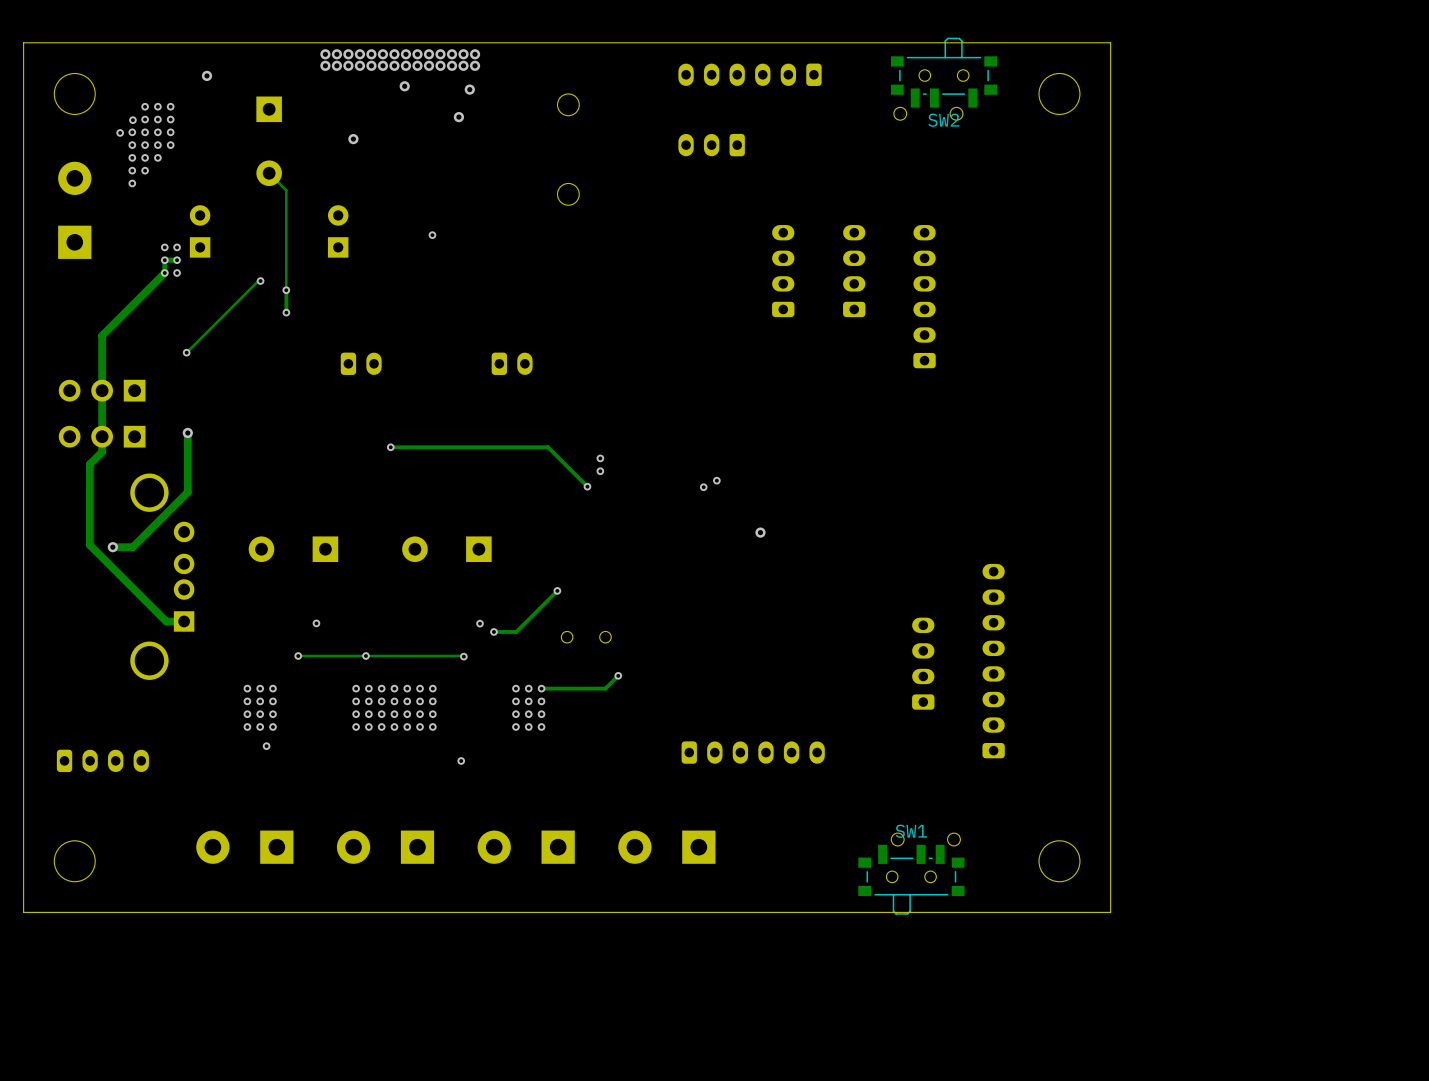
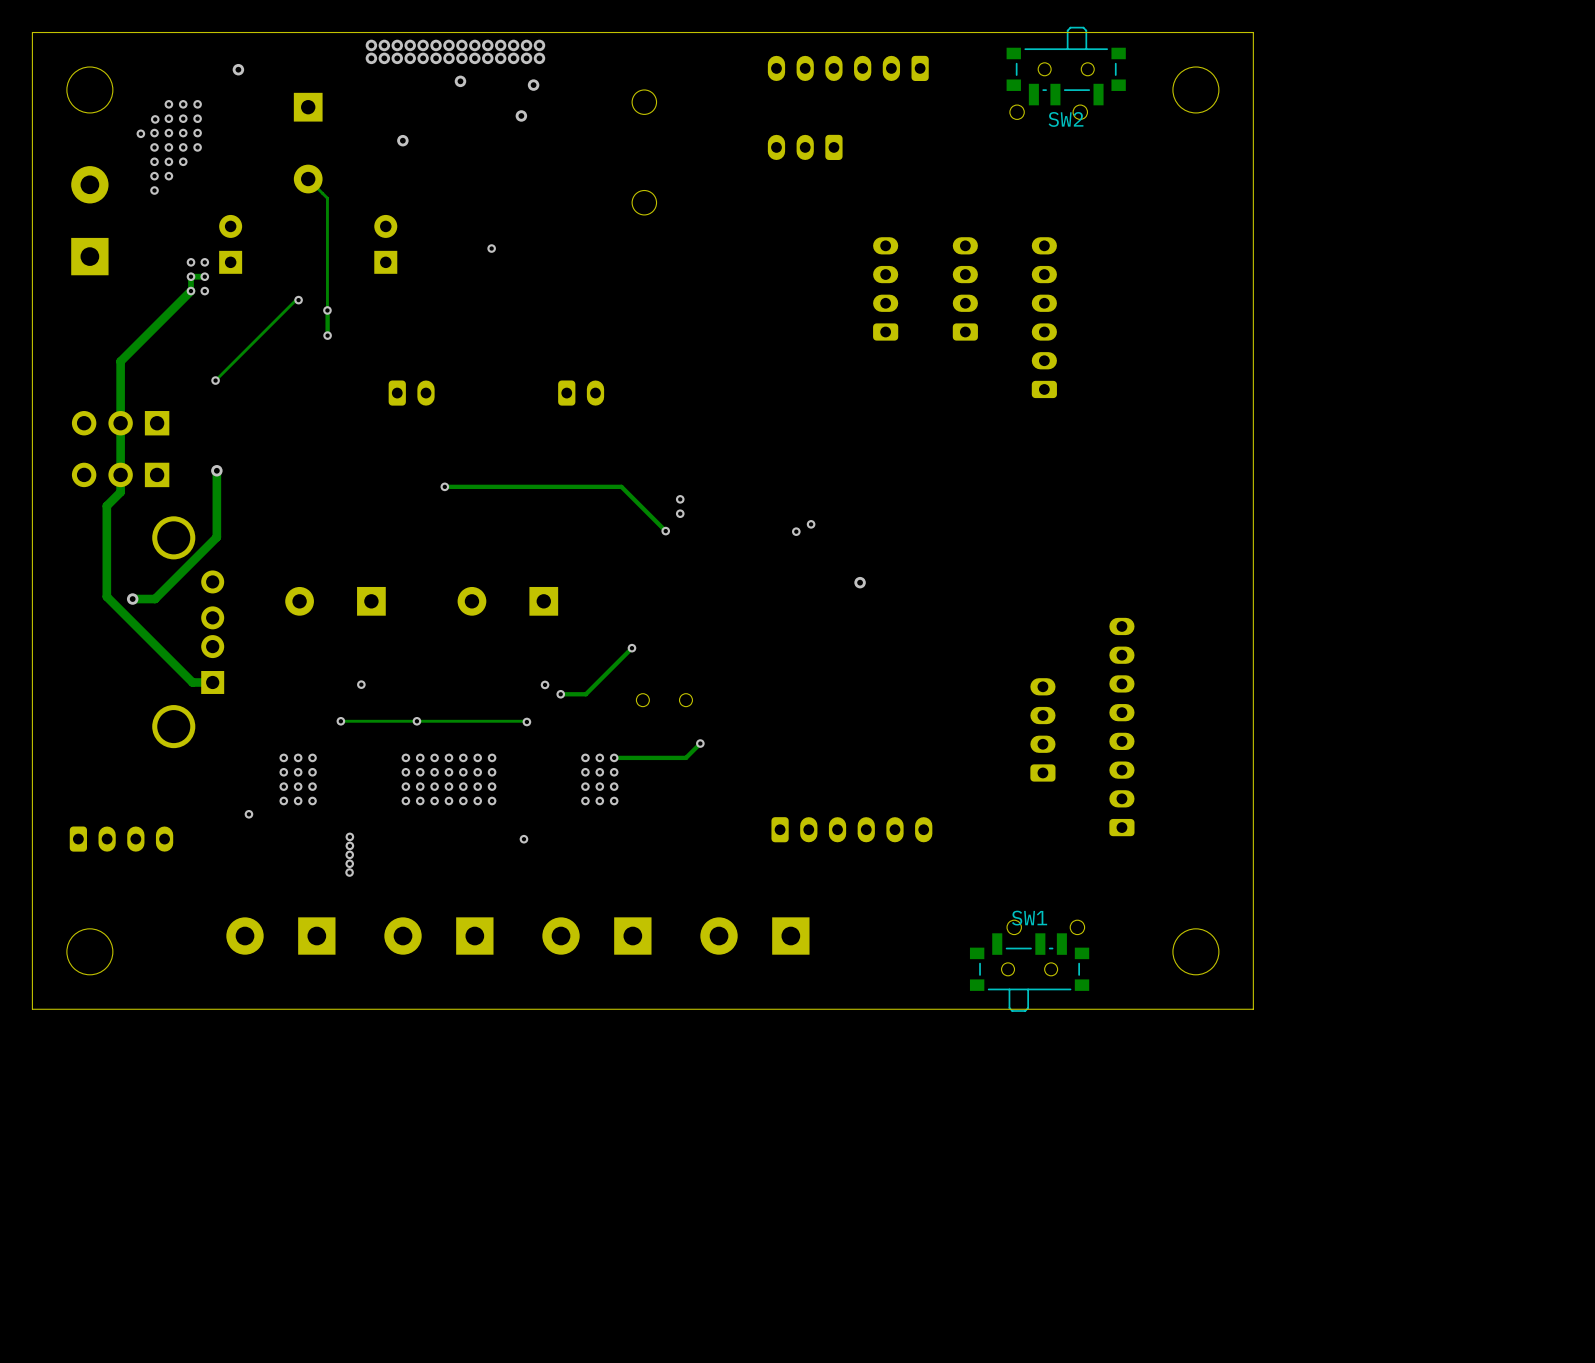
via: none -> (248, 814)
via: (266, 746) -> none
via: none -> (349, 836)
via: none -> (349, 845)
via: none -> (349, 854)
via: none -> (349, 863)
via: none -> (349, 872)

